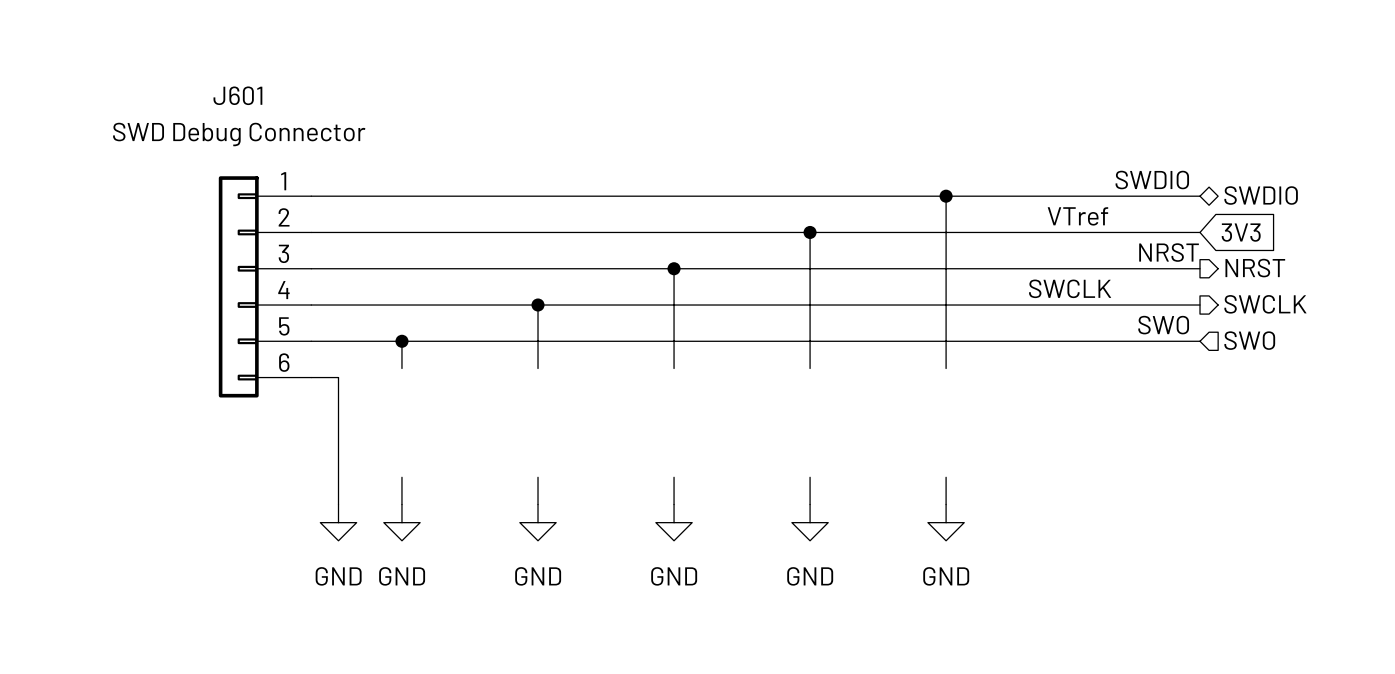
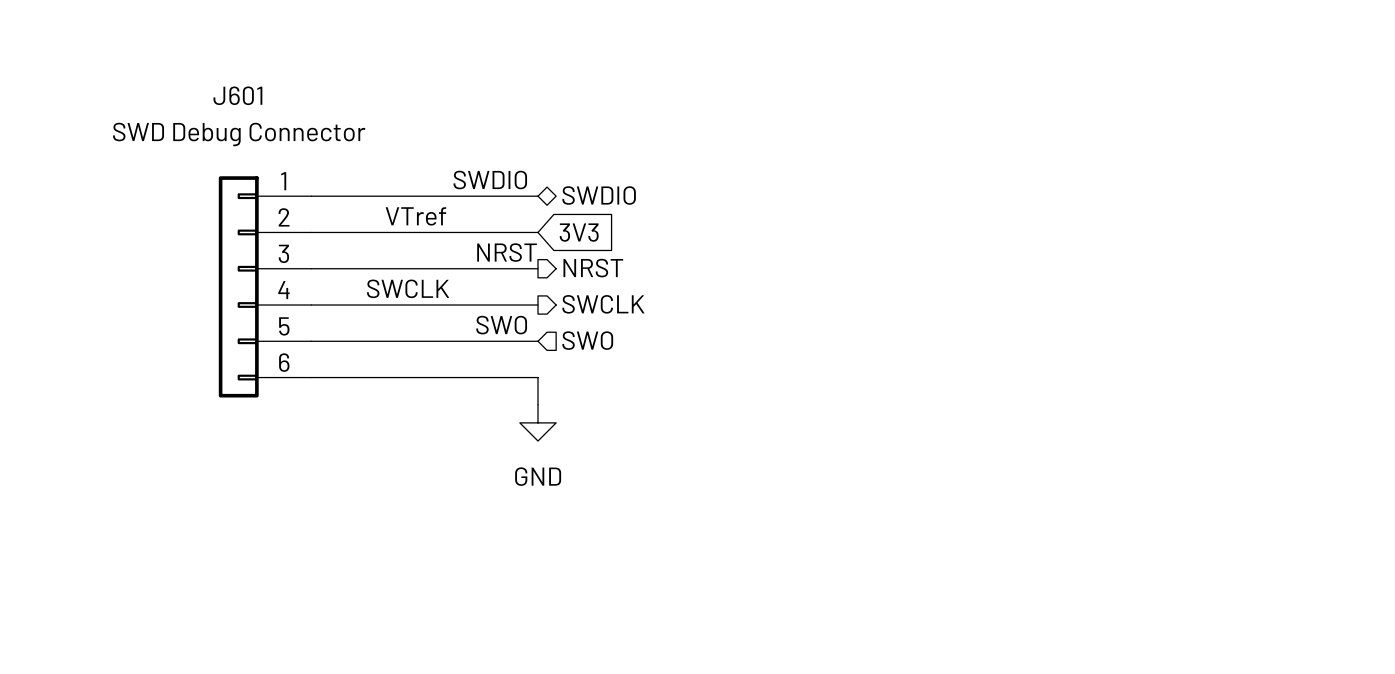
label: none -> SWDIO (490, 180)
label: SWDIO (1152, 180) -> none
hierarchical label: none -> SWDIO (599, 195)
hierarchical label: SWDIO (1261, 195) -> none
wire: (538, 196) (1200, 196) -> none
wire: (946, 196) (946, 368) -> none
junction: (946, 196) -> none
label: none -> VTref (415, 216)
label: VTref (1077, 216) -> none
wire: (538, 232) (1200, 232) -> none
global label: none -> 3V3 (579, 232)
wire: (810, 232) (810, 368) -> none
junction: (810, 232) -> none
global label: 3V3 (1241, 232) -> none
label: none -> NRST (507, 252)
label: NRST (1169, 252) -> none
wire: (538, 268) (1200, 268) -> none
hierarchical label: none -> NRST (593, 268)
wire: (674, 268) (674, 368) -> none
junction: (674, 268) -> none
hierarchical label: NRST (1255, 268) -> none
label: none -> SWCLK (408, 288)
label: SWCLK (1070, 288) -> none
hierarchical label: none -> SWCLK (603, 304)
hierarchical label: SWCLK (1265, 304) -> none
junction: (538, 305) -> none
wire: (1200, 305) (538, 305) (538, 368) -> none
label: none -> SWO (501, 325)
label: SWO (1163, 325) -> none
hierarchical label: none -> SWO (587, 340)
hierarchical label: SWO (1249, 340) -> none
wire: (401, 341) (401, 368) -> none
junction: (401, 341) -> none
wire: (538, 341) (1200, 341) -> none
wire: (338, 377) (338, 504) -> (338, 377) (538, 377) (538, 404)
power symbol: none -> GND (538, 422)
wire: (401, 477) (401, 504) -> none
wire: (538, 477) (538, 504) -> none
wire: (674, 477) (674, 504) -> none
wire: (810, 477) (810, 504) -> none
wire: (946, 477) (946, 504) -> none
power symbol: GND (338, 522) -> none
power symbol: GND (401, 522) -> none
power symbol: GND (538, 522) -> none
power symbol: GND (674, 522) -> none
power symbol: GND (810, 522) -> none
power symbol: GND (946, 522) -> none

